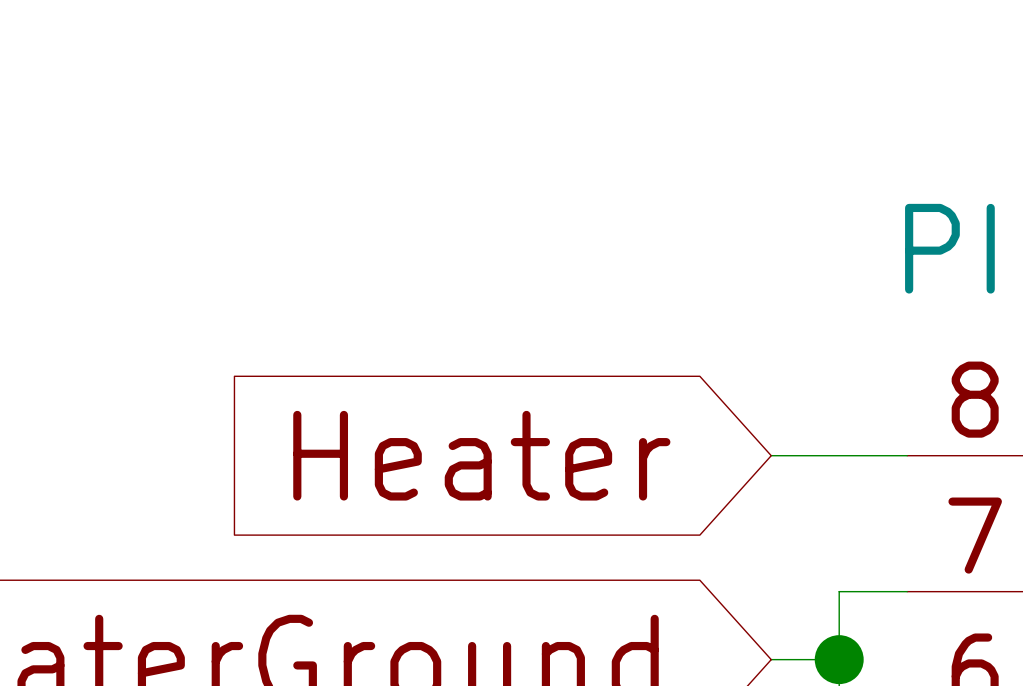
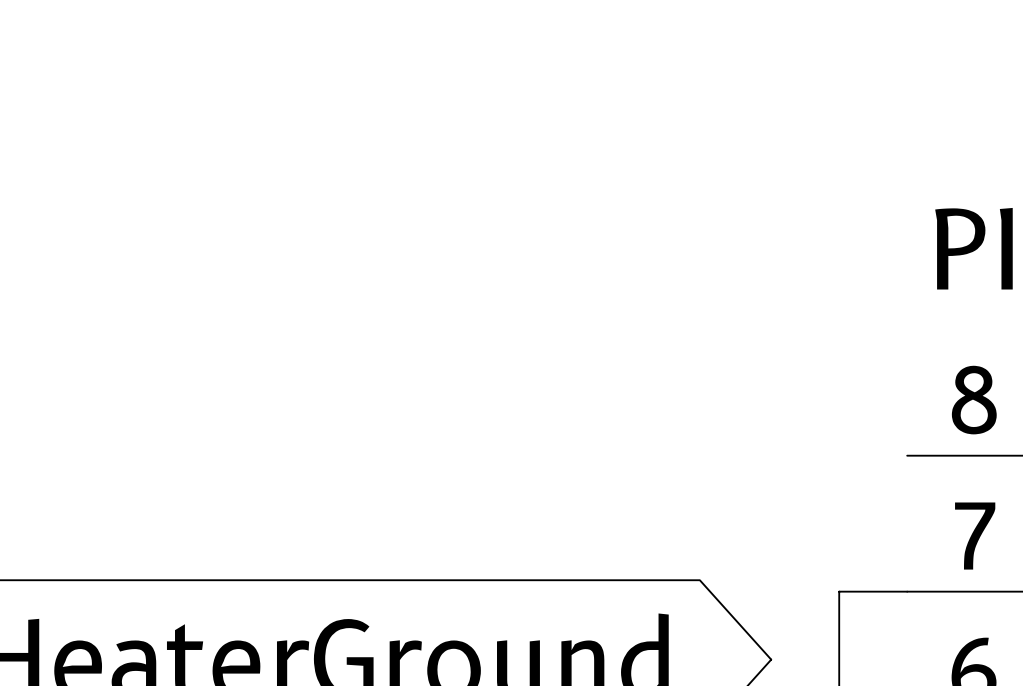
global label: Heater (481, 455) -> none
wire: (771, 455) (907, 455) -> none
wire: (771, 659) (839, 659) -> none
junction: (839, 659) -> none

